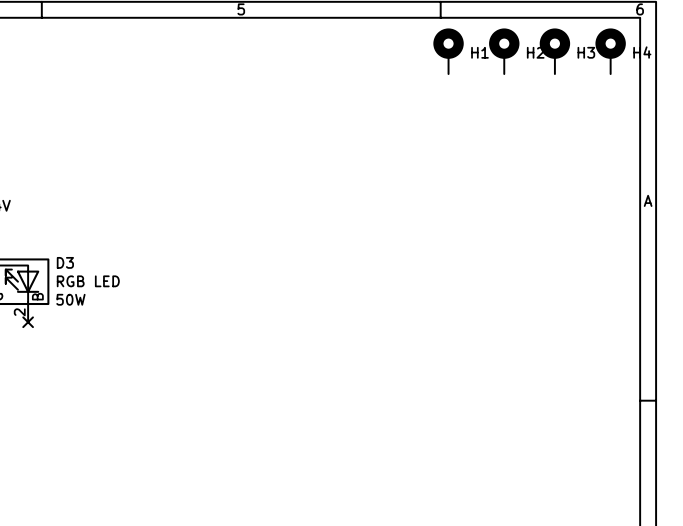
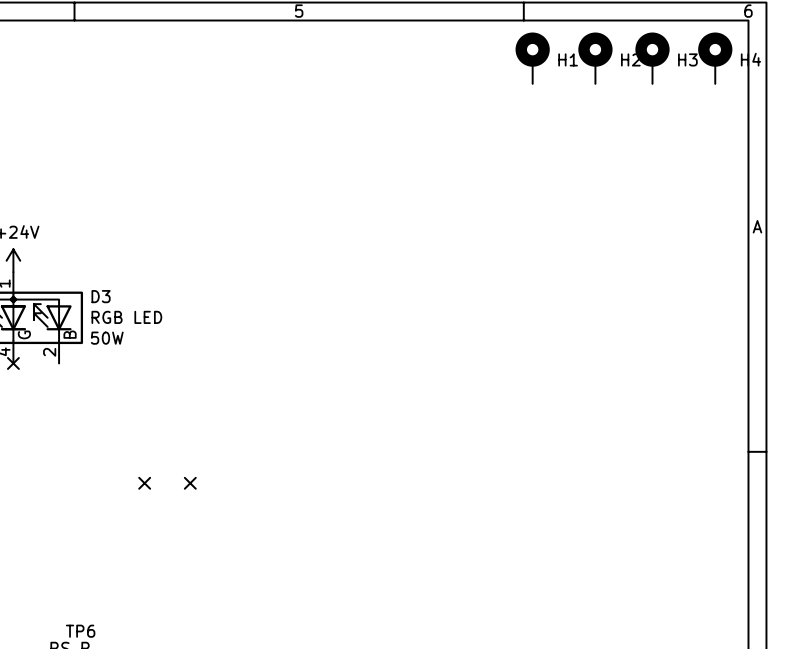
no-connect mark: (28, 322) -> none
no-connect mark: none -> (144, 483)
no-connect mark: none -> (190, 483)

